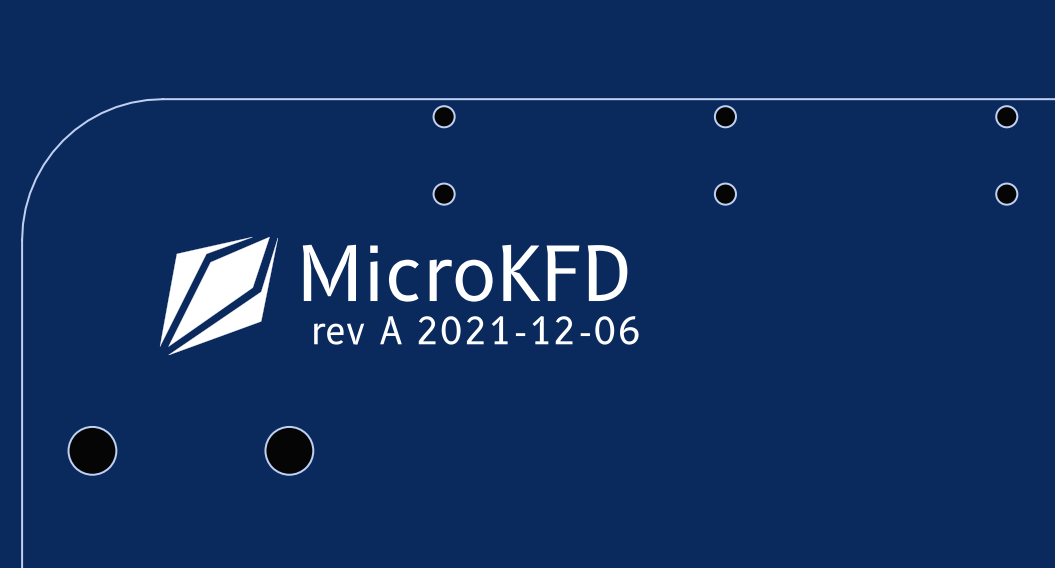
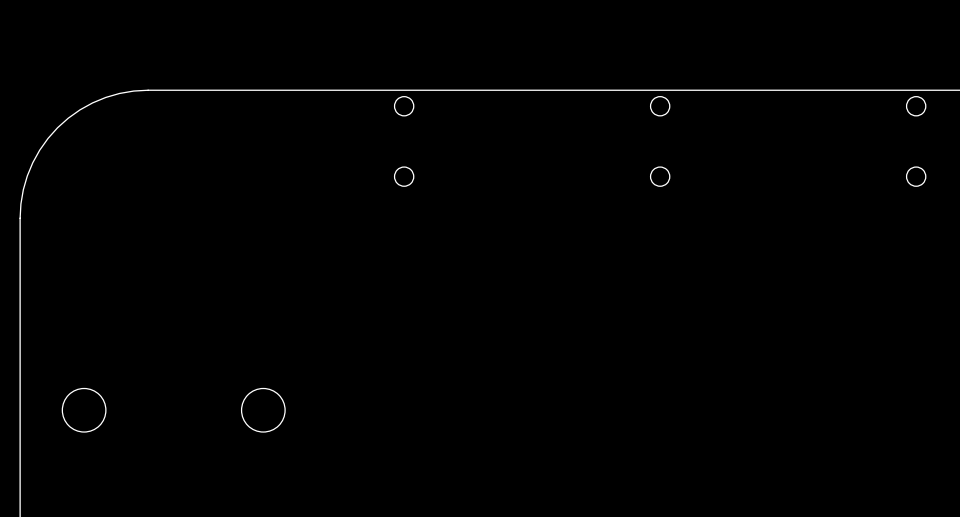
drawing: [159, 236, 279, 356] -> none
text: MicroKFD (465, 273) -> none
text: rev A 2021-12-06 (476, 330) -> none

